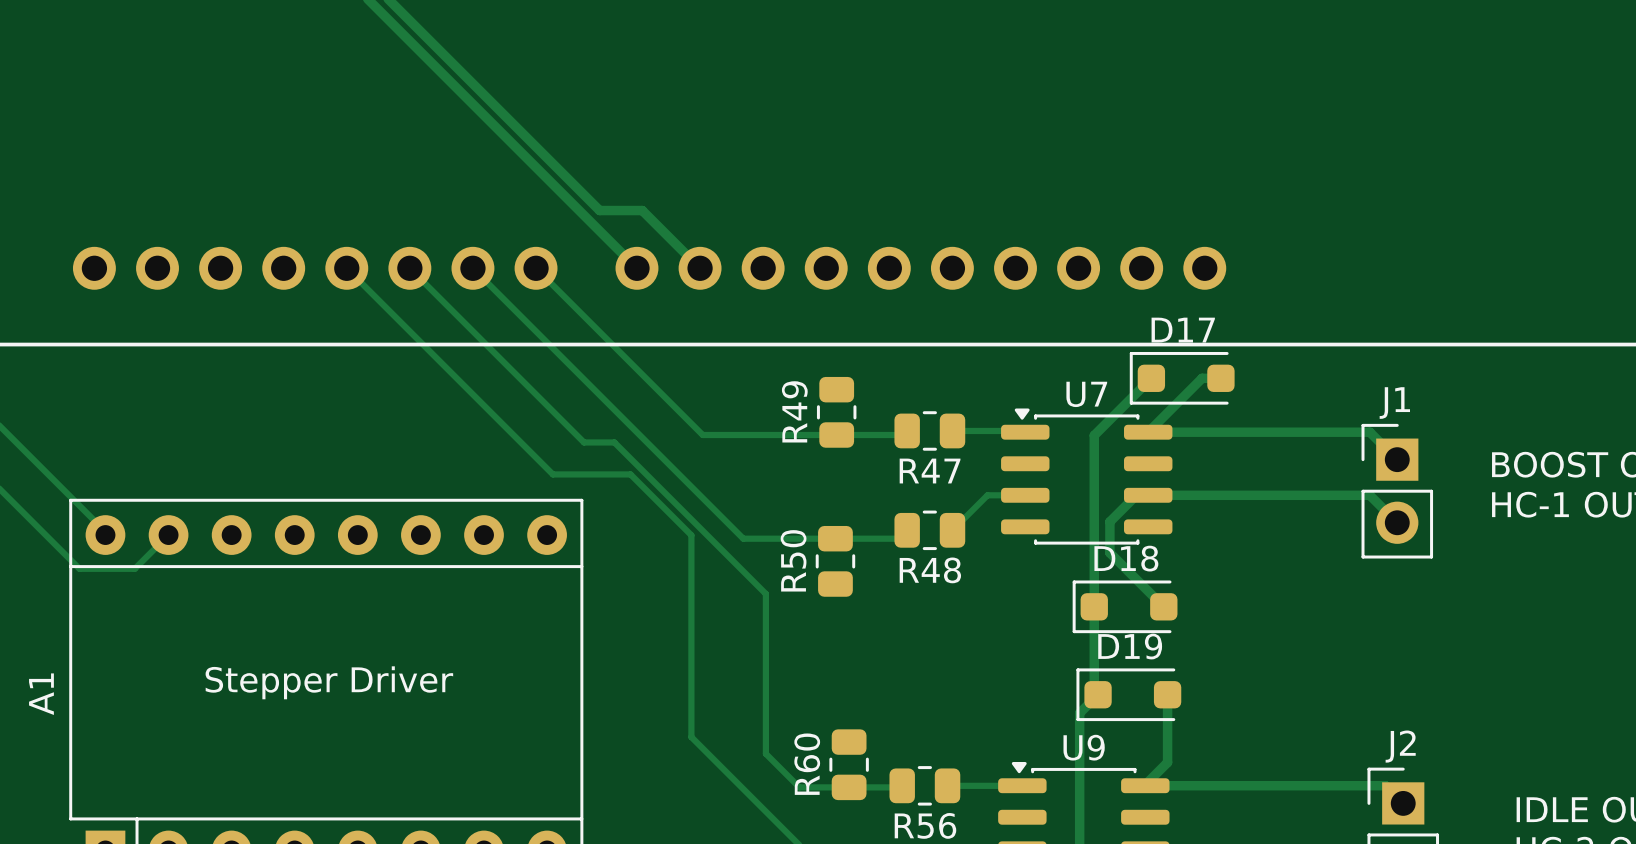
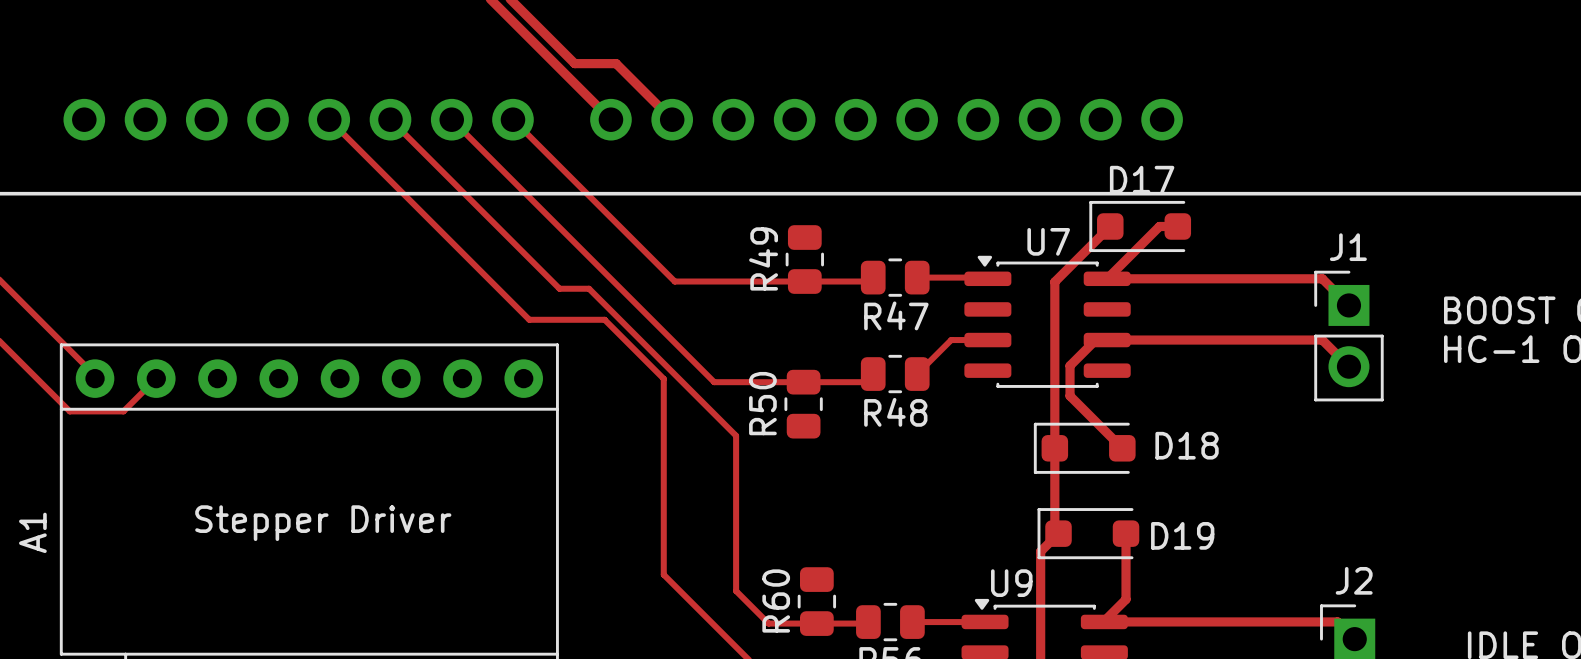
D18 name position: D18 (1126, 558) -> D18 (1187, 445)
D19 name position: D19 (1130, 646) -> D19 (1182, 535)
U9 name position: U9 (1084, 747) -> U9 (1011, 583)

